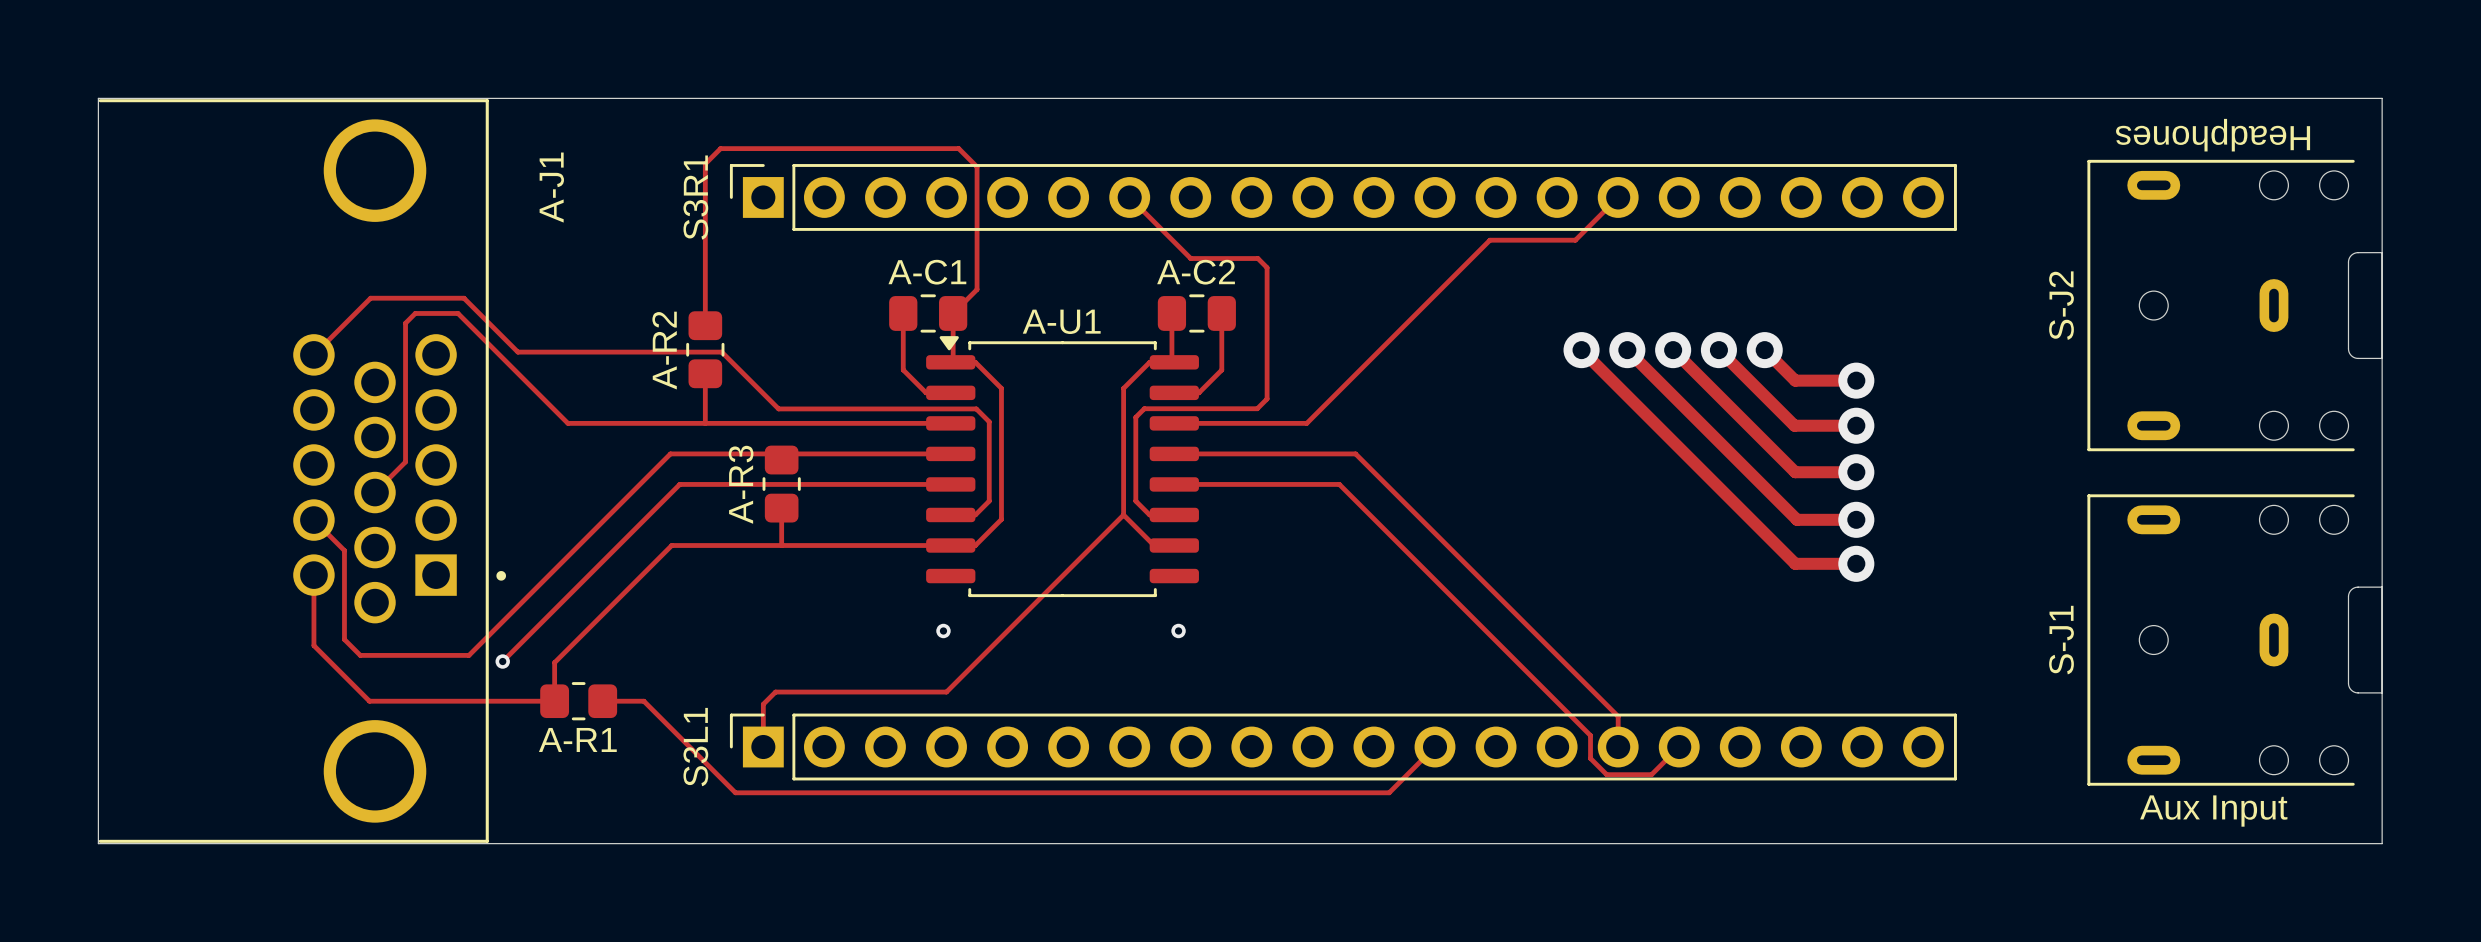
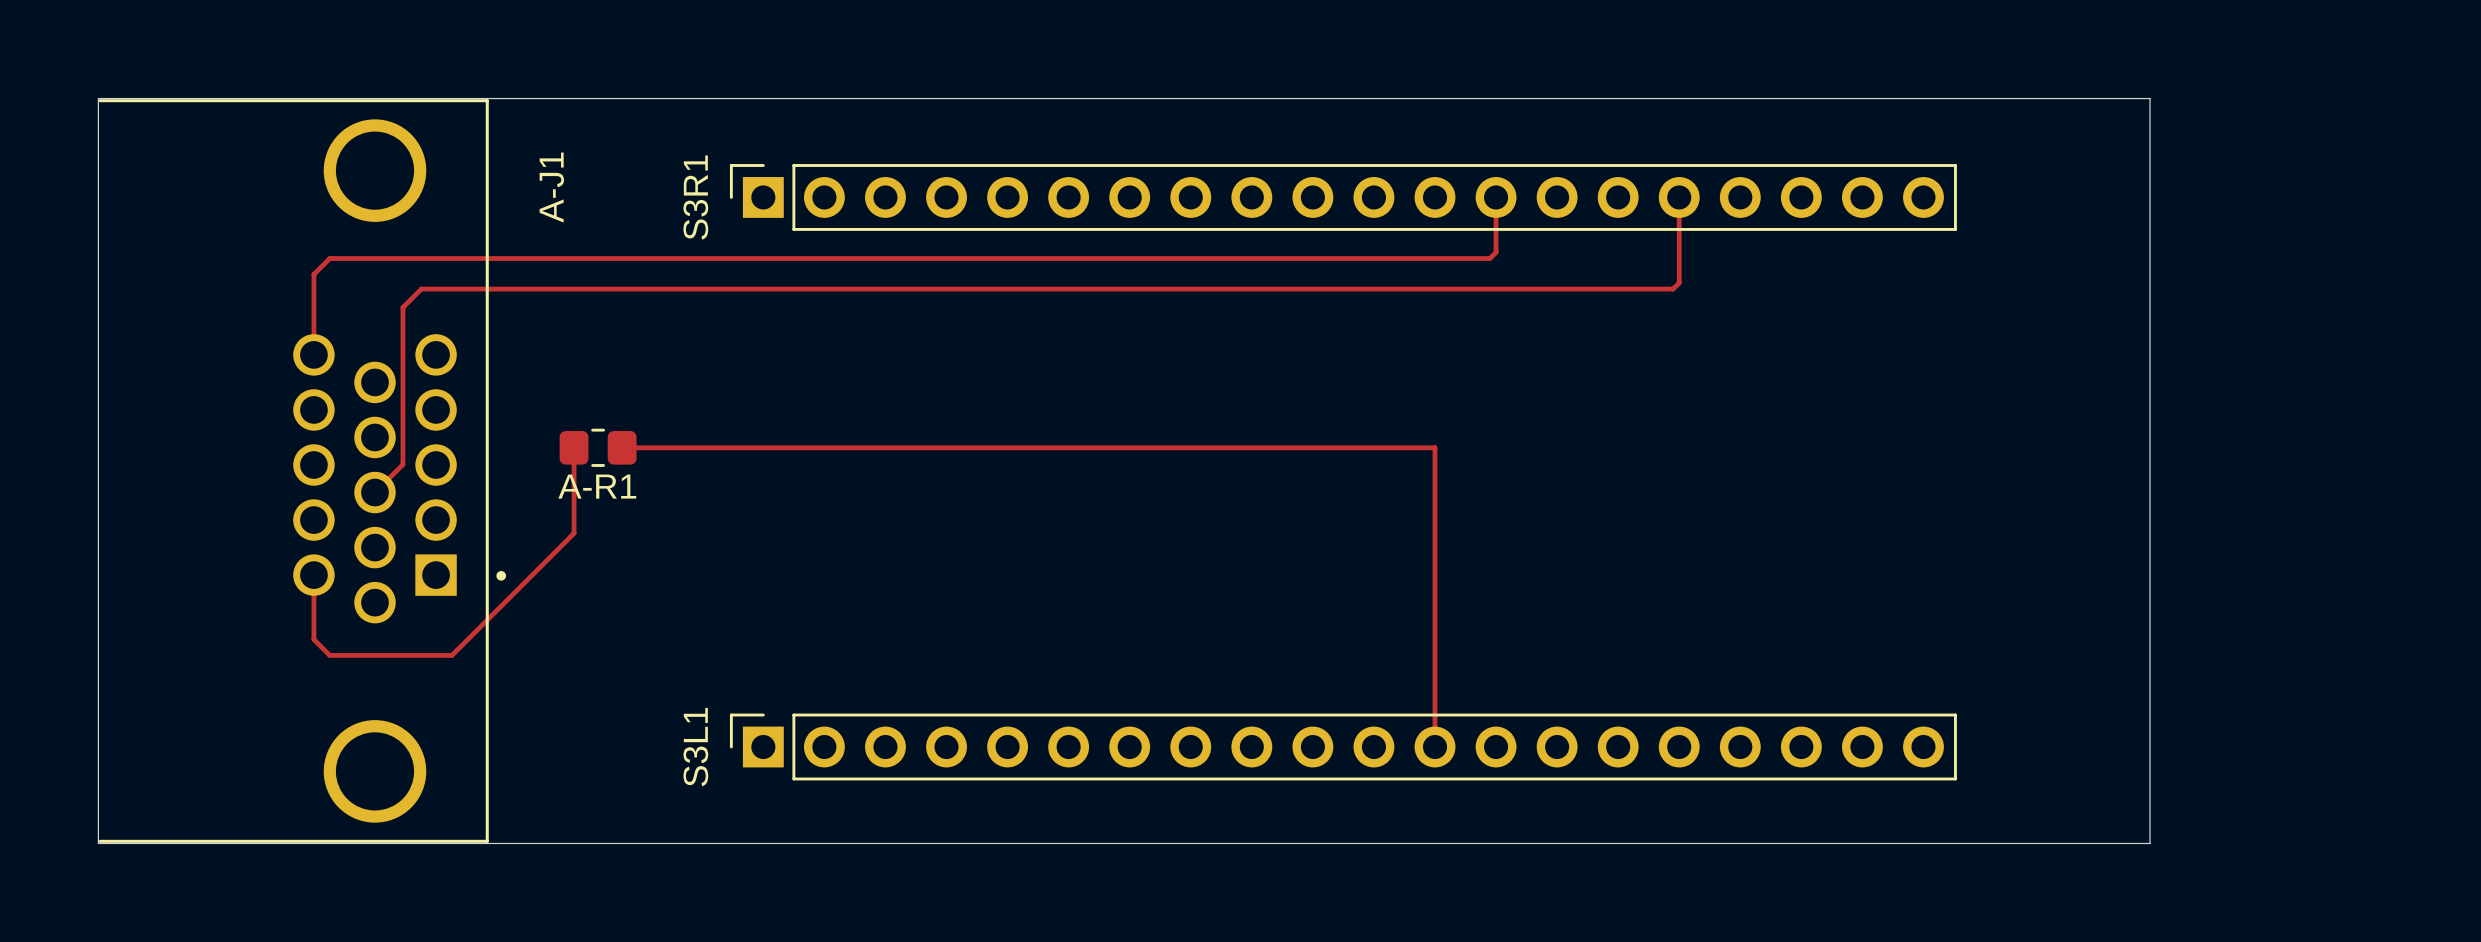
board edge: (98, 98) (2382, 98) (2382, 843) (98, 843) -> (98, 98) (2150, 98) (2150, 843) (98, 843)
track: (1129, 197) (1190, 258) -> none
track: (1618, 197) (1575, 240) (1489, 240) (1306, 423) (1174, 423) -> none
track: (1257, 258) (1267, 267) (1267, 398) (1257, 408) (1144, 408) (1135, 417) (1135, 501) (1149, 514) (1174, 514) -> (1257, 258) (1489, 258) (1496, 252) (1496, 197)
S-J2: Headphones (2234, 305) -> none
track: (903, 313) (903, 370) (926, 392) (952, 392) -> none
A-C1: (928, 313) -> none
track: (1171, 313) (1171, 359) -> none
A-C2: (1196, 313) -> none
track: (1221, 313) (1221, 370) (1198, 392) (1174, 392) -> none
track: (705, 325) (705, 163) (720, 148) (958, 148) (977, 166) (977, 289) (953, 313) (953, 359) -> none
A-R2: (705, 349) -> none
track: (1581, 350) (1795, 563) (1856, 563) -> none
via: (1581, 350) -> none
track: (1627, 350) (1797, 519) (1856, 519) -> none
via: (1627, 350) -> none
track: (1673, 350) (1795, 472) (1856, 472) -> none
via: (1673, 350) -> none
track: (1718, 350) (1794, 425) (1856, 425) -> none
via: (1718, 350) -> none
track: (1764, 350) (1795, 380) (1856, 380) -> none
via: (1764, 350) -> none
track: (313, 354) (370, 298) (464, 298) (517, 352) (721, 352) (778, 408) (976, 408) (989, 421) (989, 501) (975, 514) (950, 514) -> (313, 354) (313, 274) (329, 258) (1190, 258)
track: (950, 362) (975, 362) (1001, 388) (1001, 519) (975, 545) (671, 545) (554, 662) (554, 701) (369, 701) (313, 645) (313, 639) -> none
track: (1174, 362) (1149, 362) (1123, 388) (1123, 514) -> none
track: (705, 373) (705, 423) -> none
via: (1856, 380) -> none
track: (950, 423) (567, 423) (458, 313) (415, 313) (405, 323) (405, 462) (402, 464) -> (1679, 197) (1679, 282) (1673, 289) (421, 289) (402, 307) (402, 464)
via: (1856, 425) -> none
track: (775, 453) (670, 453) (468, 655) (451, 655) -> (574, 447) (574, 533) (451, 655)
track: (787, 453) (950, 453) -> none
track: (1174, 453) (1355, 453) (1618, 716) (1618, 747) -> none
A-U1: (1062, 466) -> none
via: (1856, 472) -> none
A-R3: (781, 484) -> none
track: (950, 484) (679, 484) (502, 661) -> none
track: (1174, 484) (1339, 484) (1590, 735) (1590, 758) (1606, 774) (1651, 774) (1679, 747) -> none
track: (781, 508) (781, 545) -> none
track: (1123, 514) (1154, 545) -> none
track: (1123, 514) (946, 692) (775, 692) (763, 704) (763, 747) -> none
via: (1856, 519) -> none
track: (313, 520) (344, 550) (344, 639) (360, 655) -> (313, 639) (329, 655) (360, 655)
via: (1856, 563) -> none
via: (943, 630) -> none
via: (1178, 630) -> none
S-J1: Aux Input (2234, 640) -> none
via: (502, 661) -> none
A-R1 position: (578, 701) -> (598, 447)
track: (602, 701) (643, 701) (735, 792) (1389, 792) (1435, 747) -> (622, 447) (1435, 447) (1435, 747)

